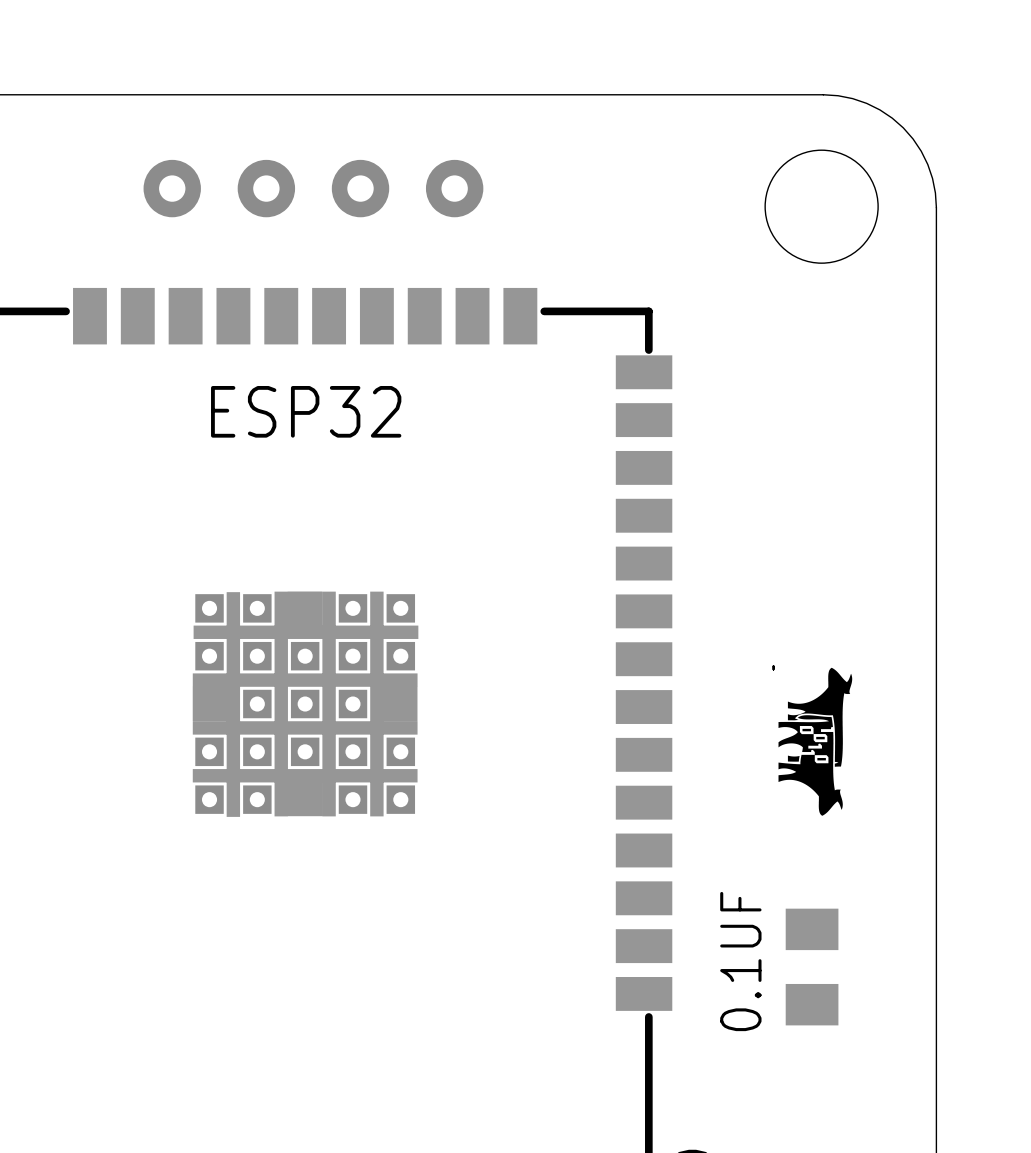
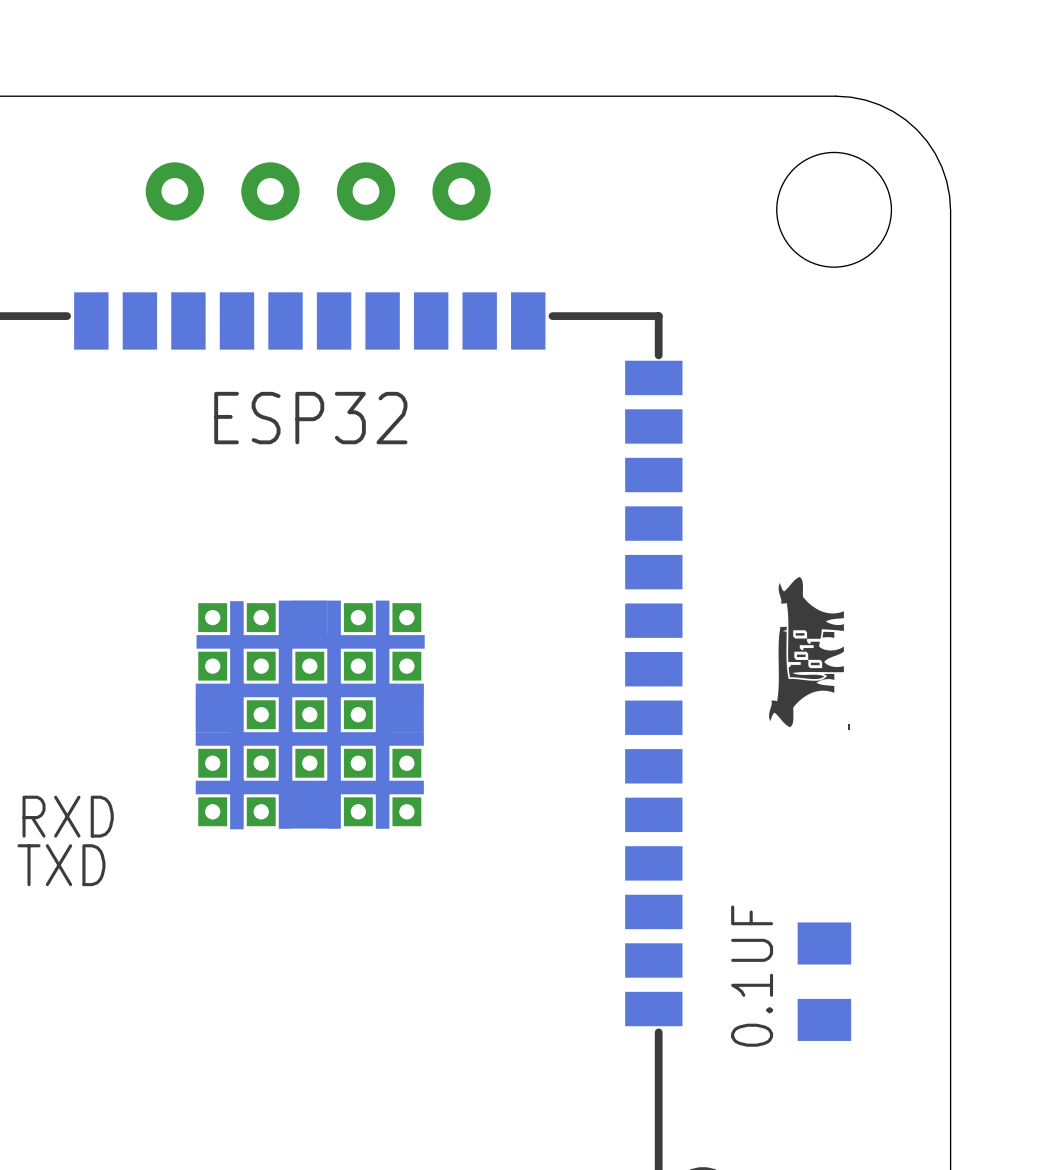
drawing: none -> [769, 576, 844, 728]
drawing: [778, 667, 853, 816] -> none
text: none -> RXD (68, 816)
text: none -> TXD (61, 865)

